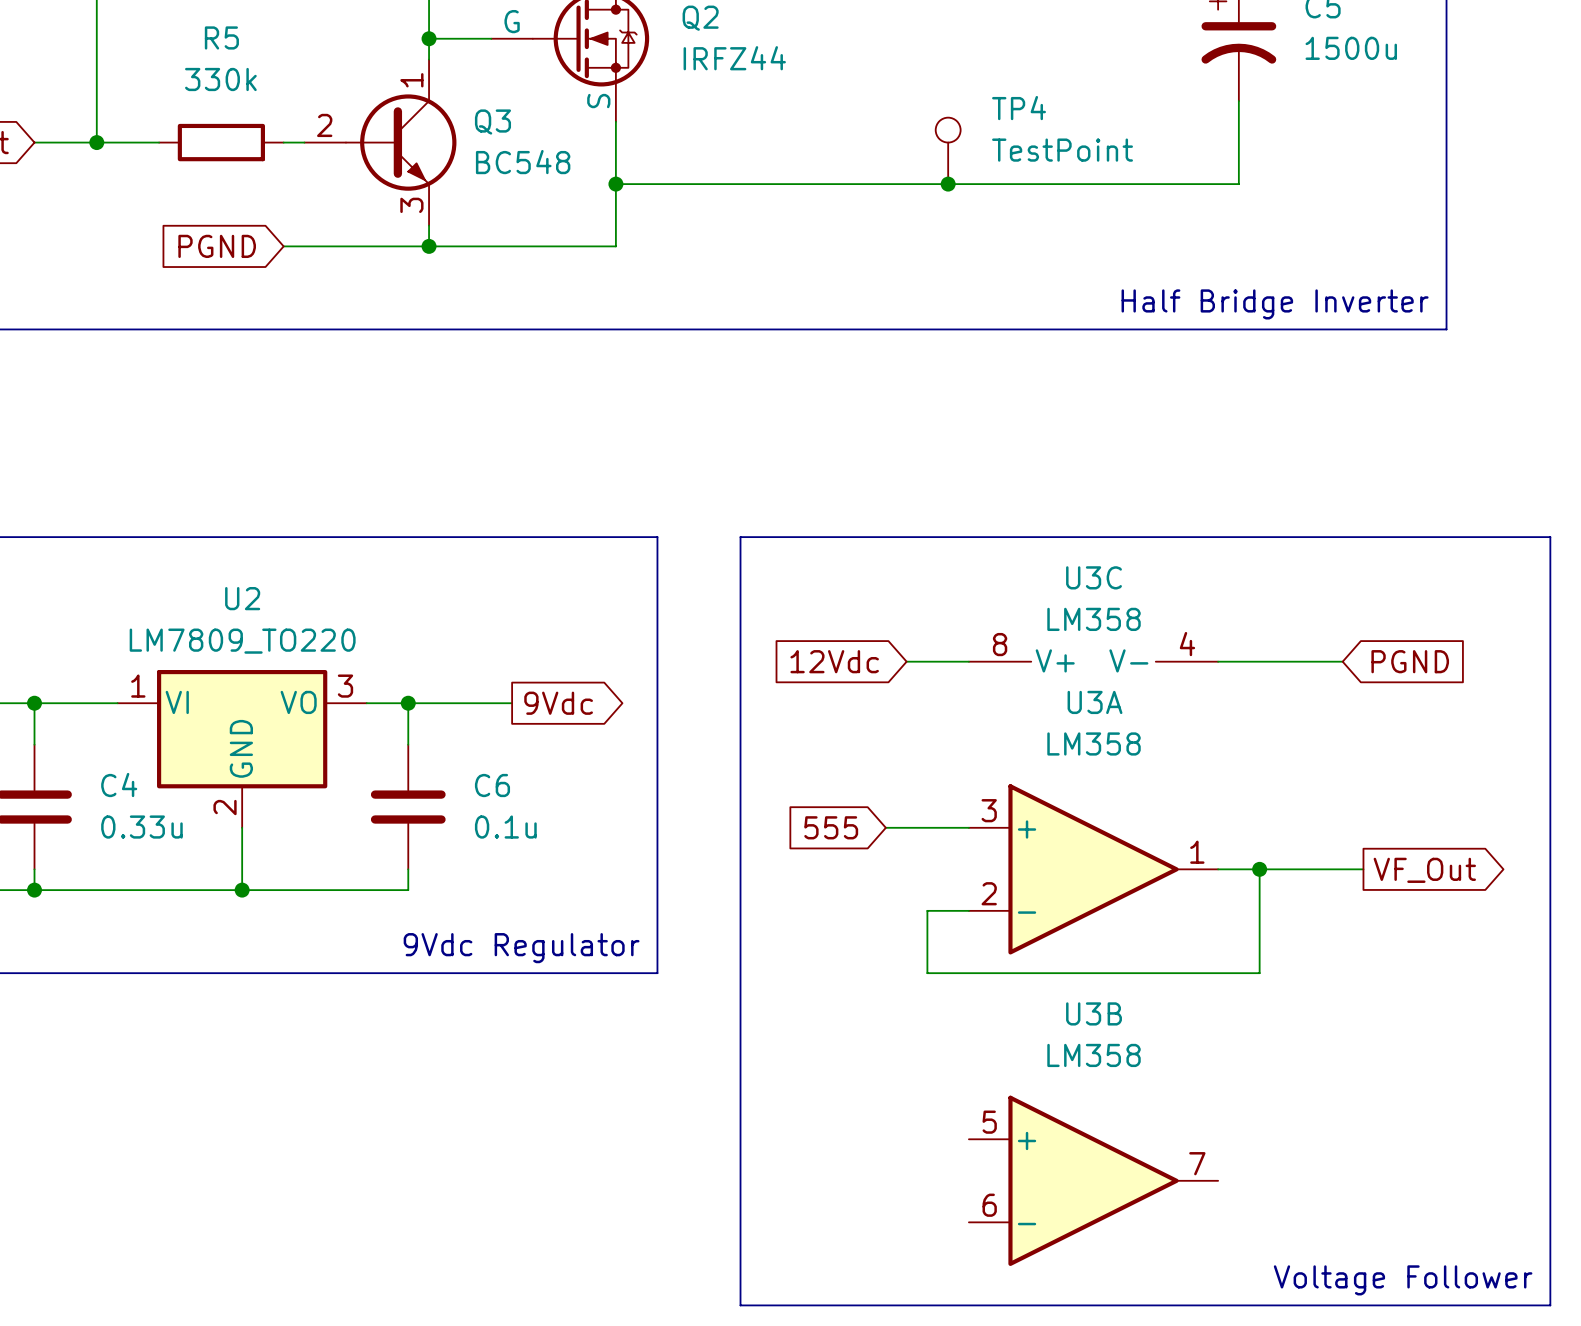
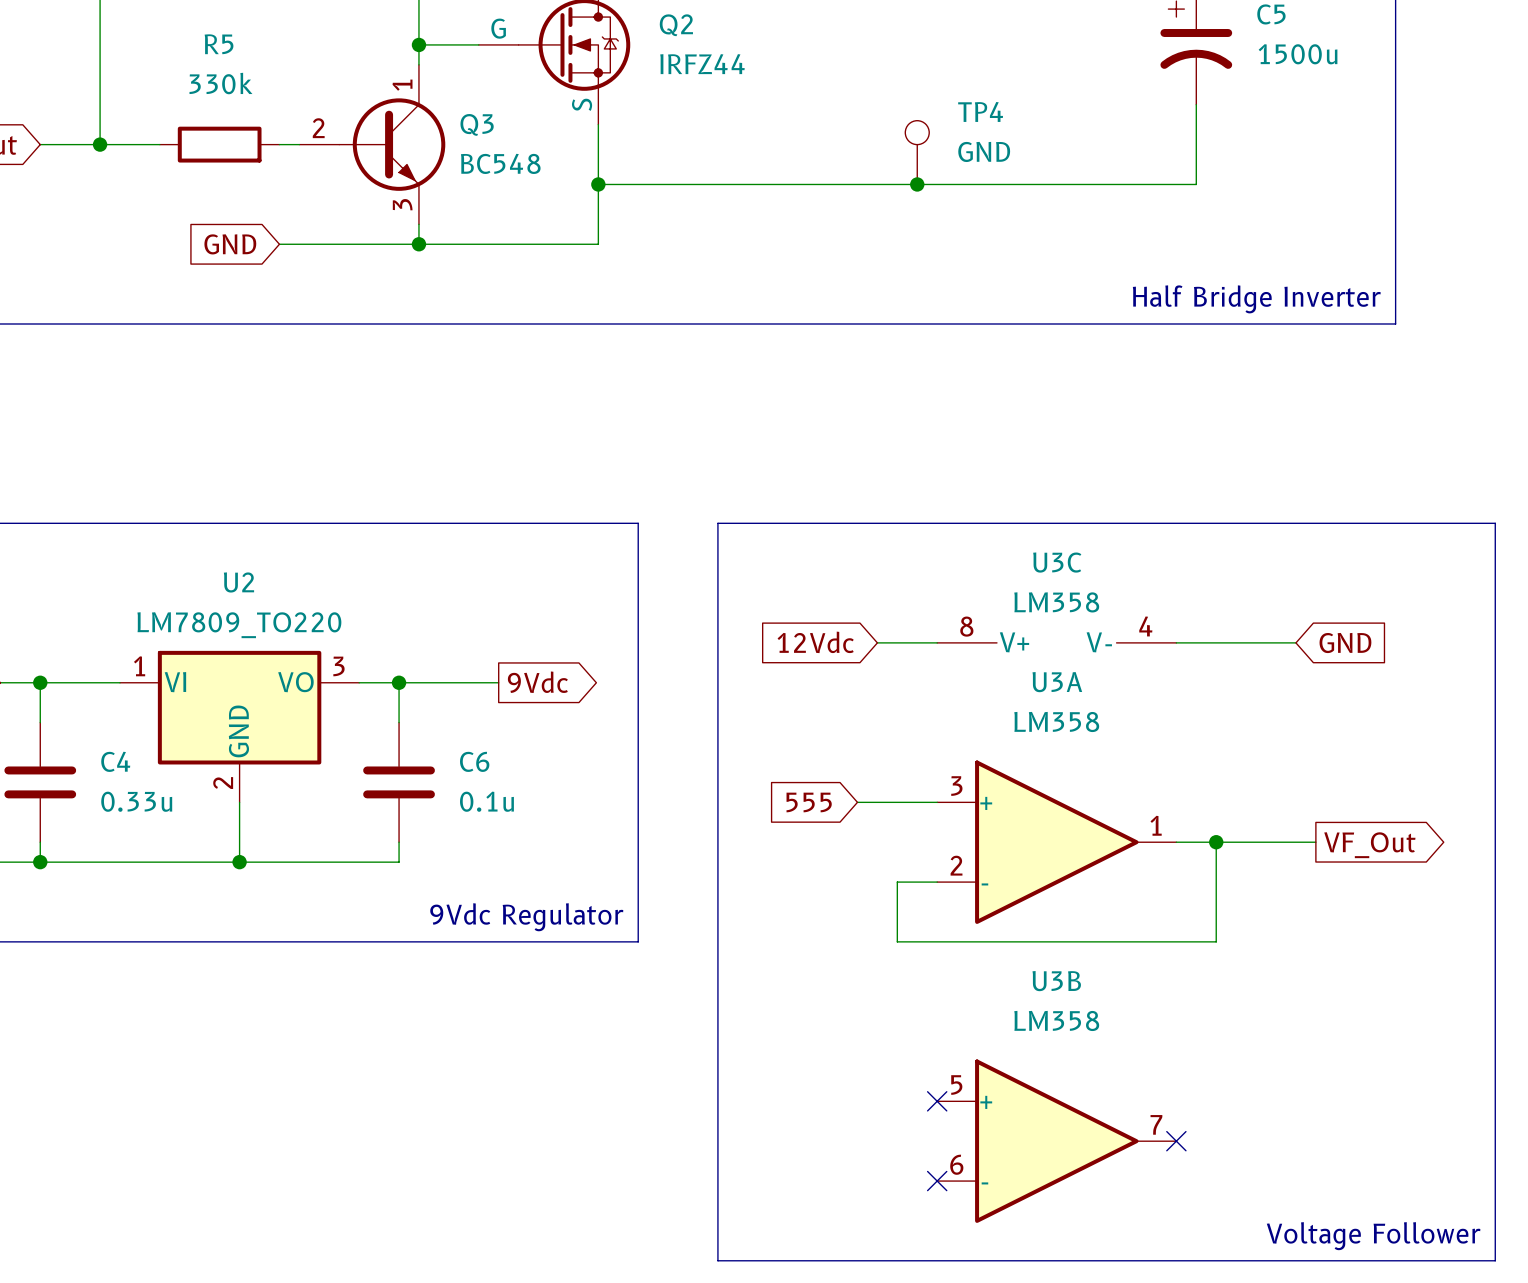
TP4 value: TestPoint (1062, 150) -> GND (984, 151)
global label: PGND (217, 246) -> GND (230, 244)
global label: PGND (1410, 661) -> GND (1345, 643)
no-connect mark: none -> (937, 1101)
no-connect mark: none -> (1176, 1141)
no-connect mark: none -> (937, 1181)

